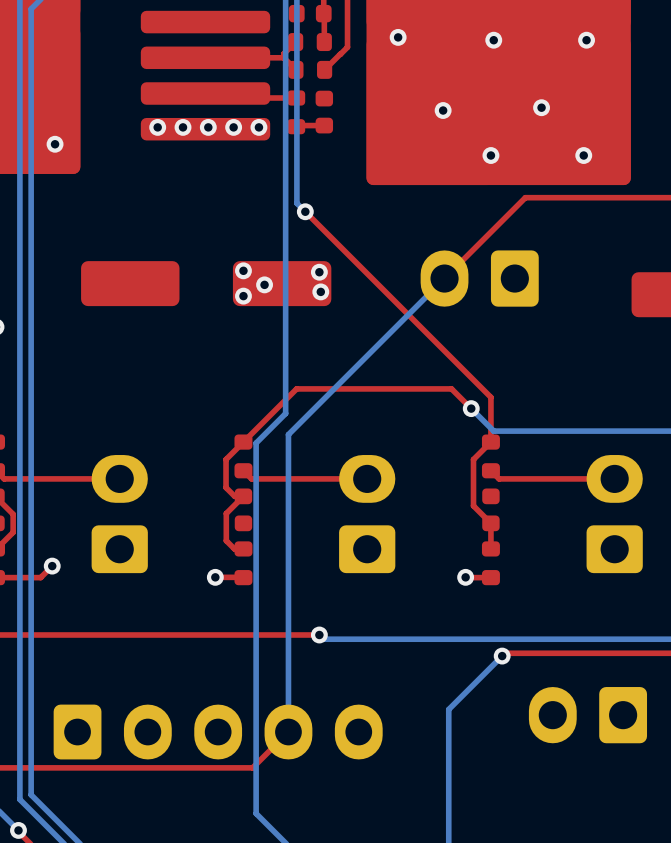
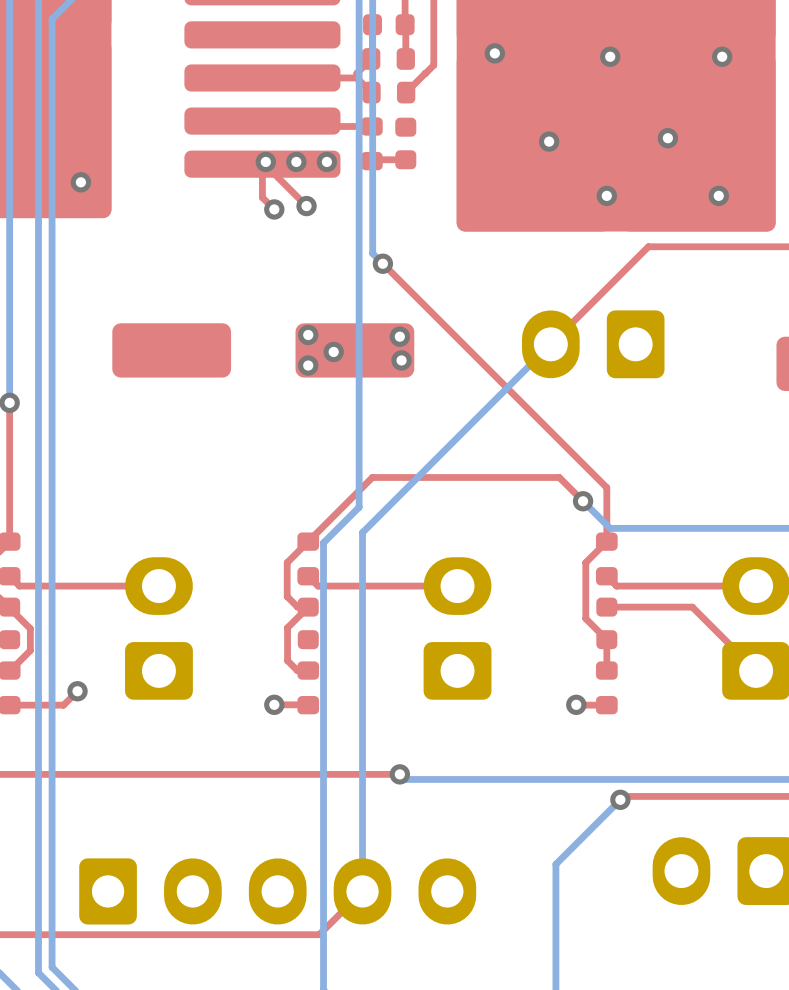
via: (157, 127) -> none
via: (183, 127) -> none
top track: none -> (306, 206) (264, 164) (262, 164) (262, 197) (274, 209)
via: none -> (306, 206)
via: none -> (274, 209)
top track: none -> (606, 607) (692, 607) (756, 670)

